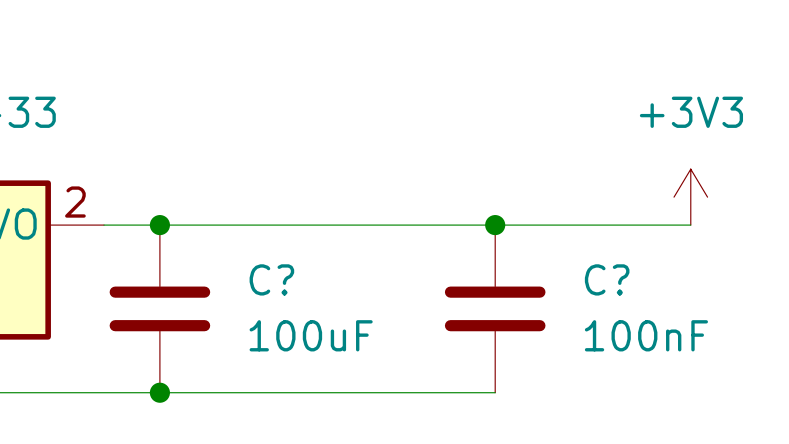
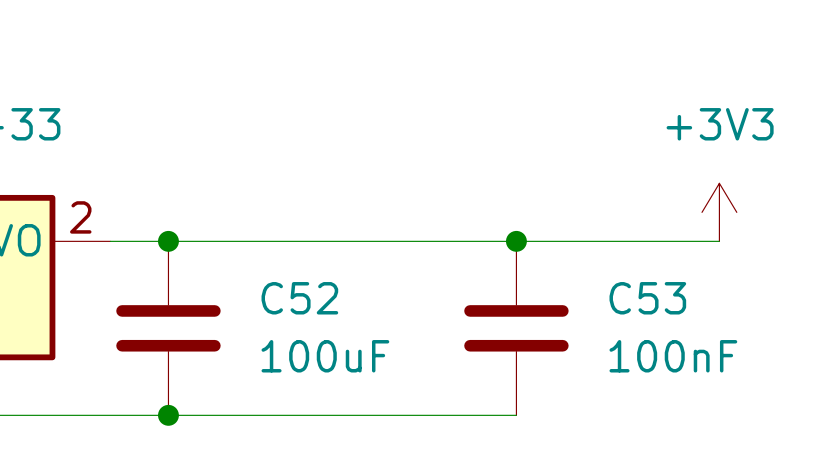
C? name: C? (271, 279) -> C52 (299, 298)
C? name: C? (607, 279) -> C53 (647, 298)

